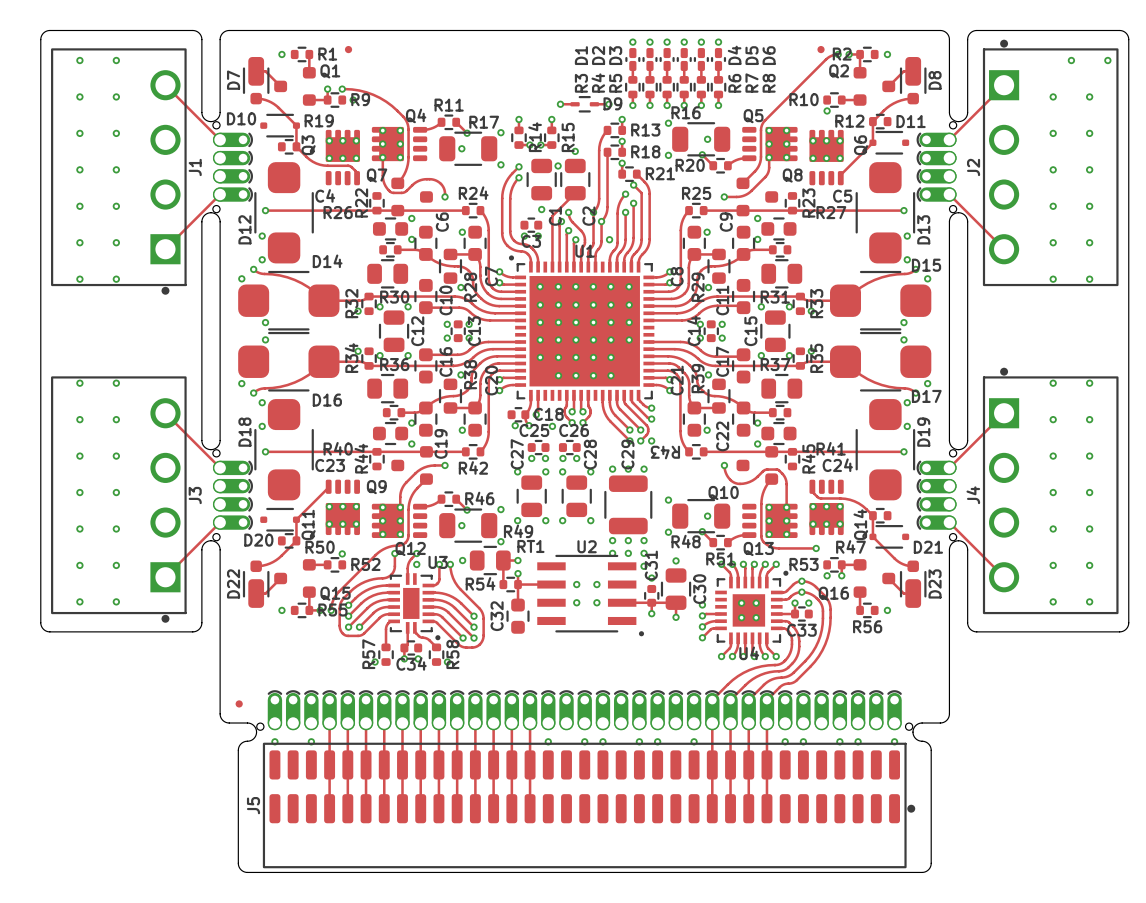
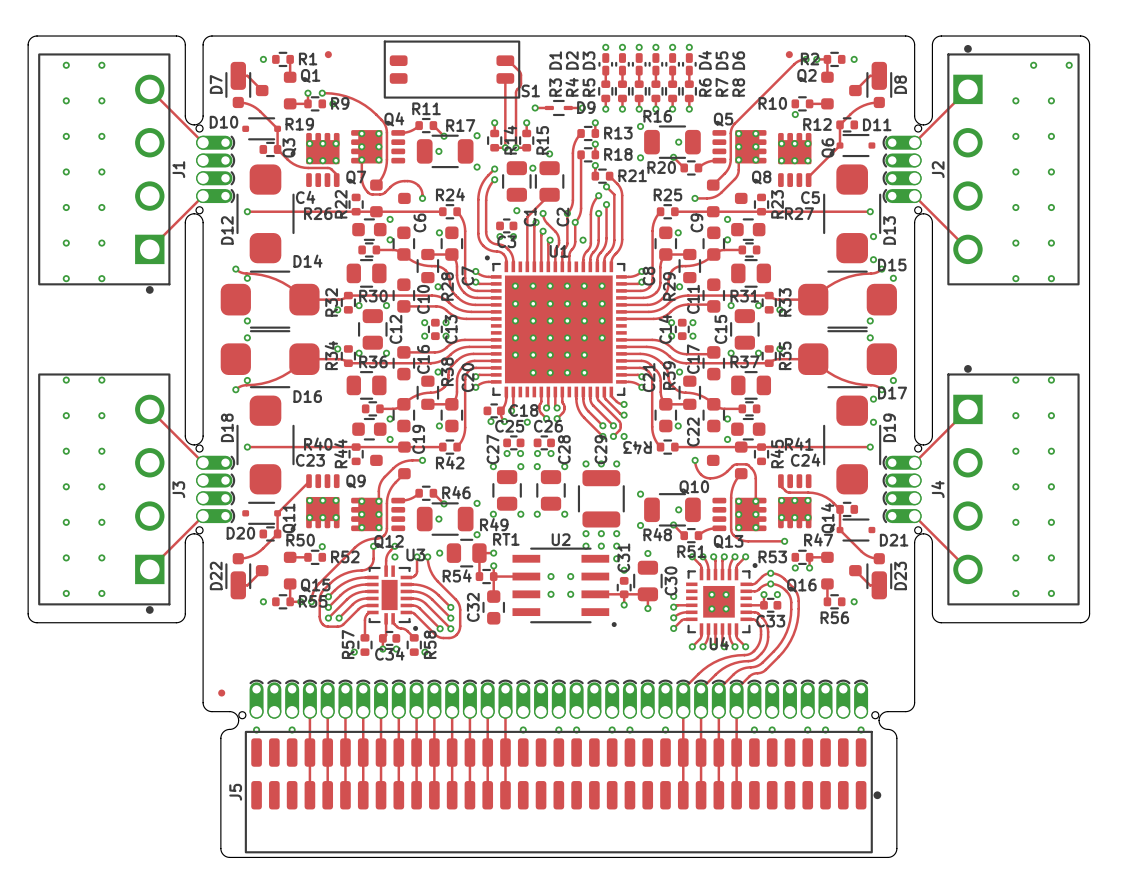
track: none -> (505, 60) (510, 62) (520, 74) (520, 84) (516, 92) (516, 147)
S1: none -> (452, 69)
track: none -> (505, 78) (505, 147)
via: (262, 236) -> none
via: (262, 259) -> none
via: (241, 278) -> none
via: none -> (247, 278)
via: (241, 383) -> none
via: none -> (247, 380)
via: (262, 402) -> none
via: (262, 426) -> none

